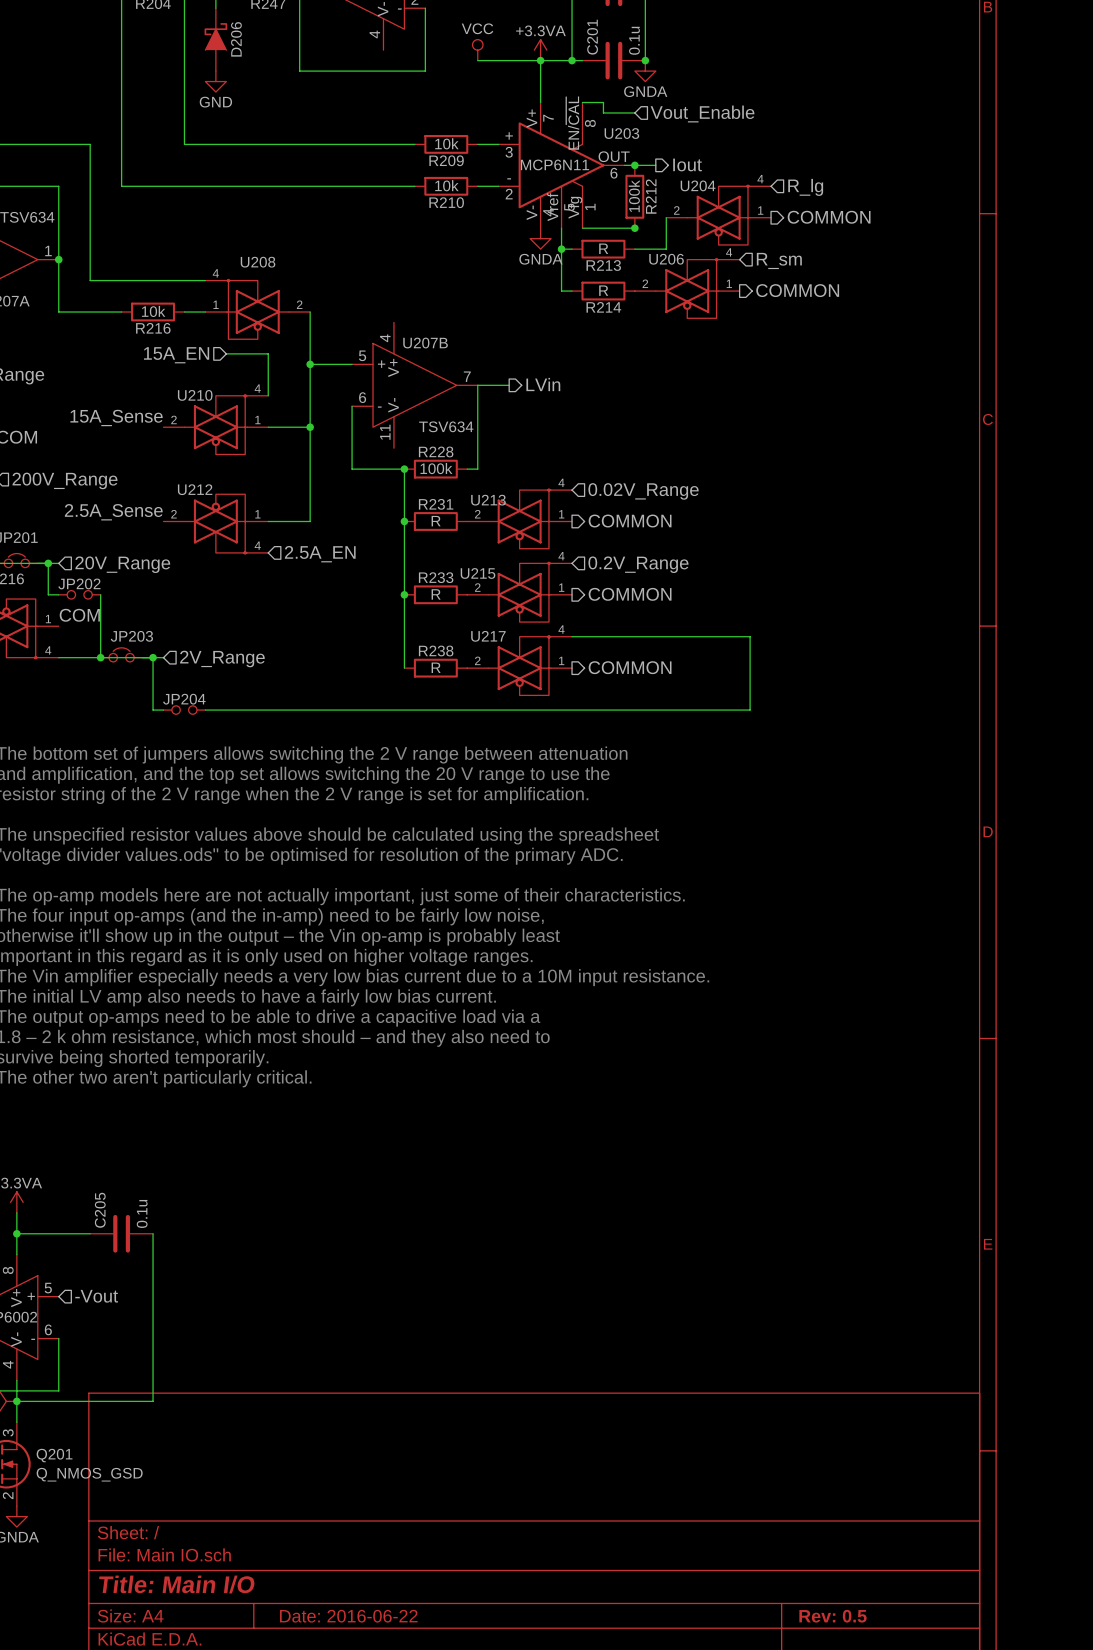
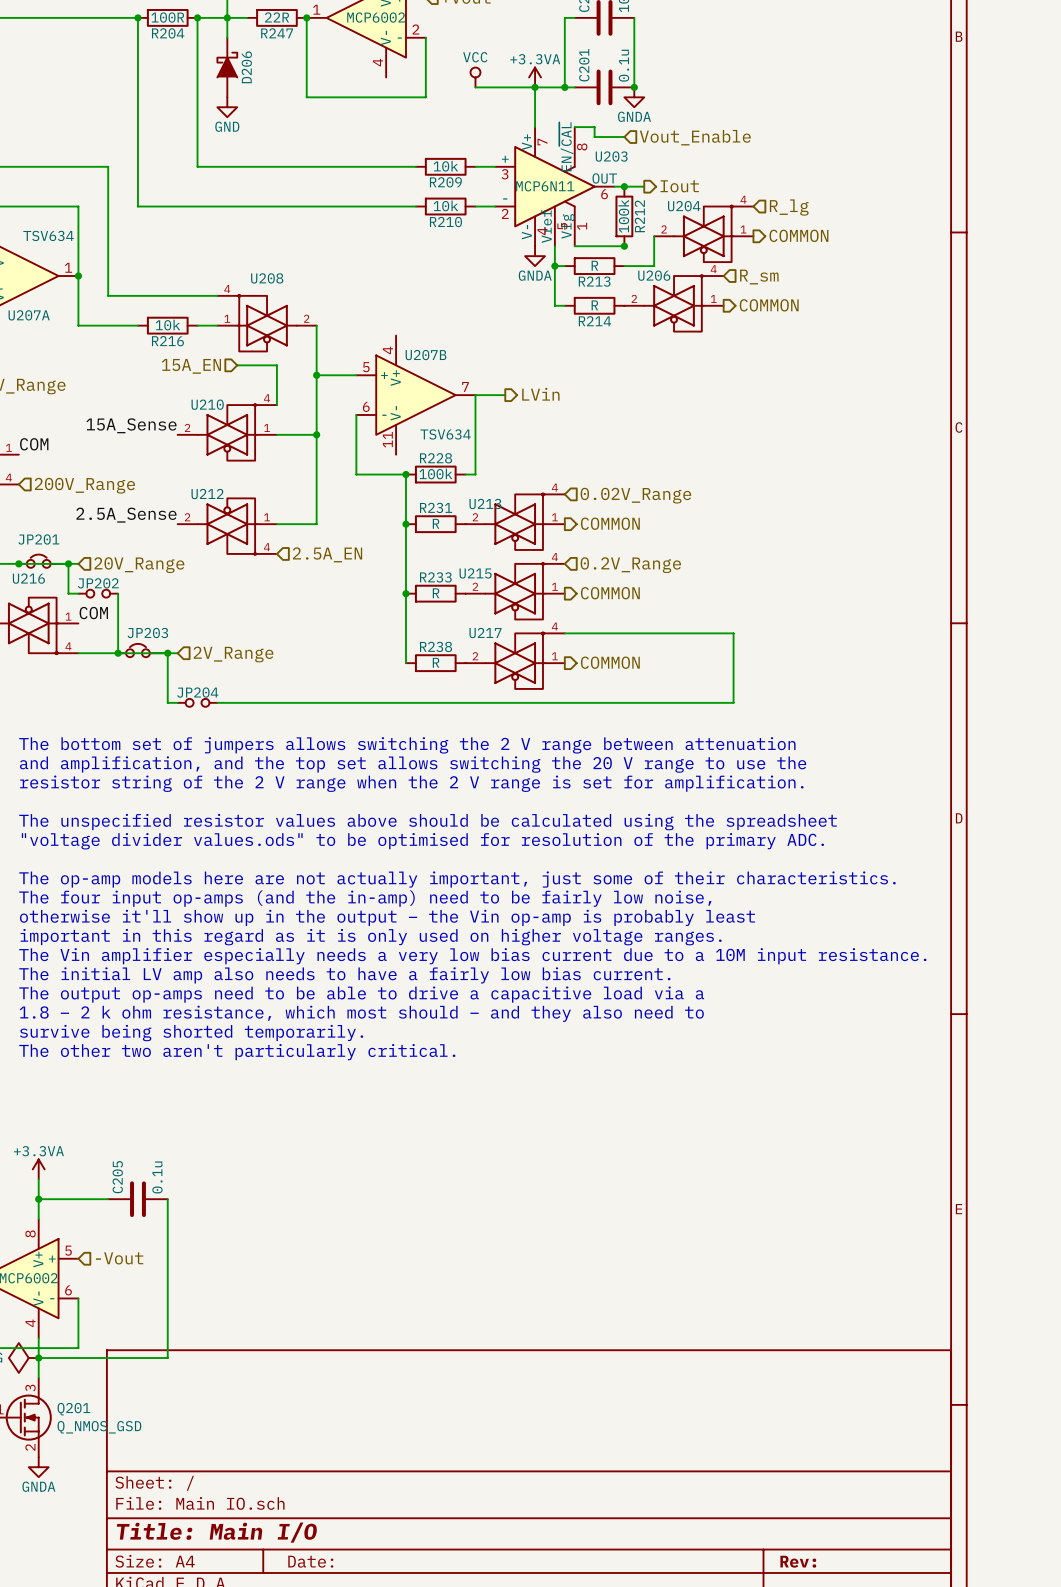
title block: Date: 2016-06-22 (348, 1616) -> Date: (310, 1561)
title block: Rev: 0.5 (832, 1616) -> Rev: (798, 1561)

